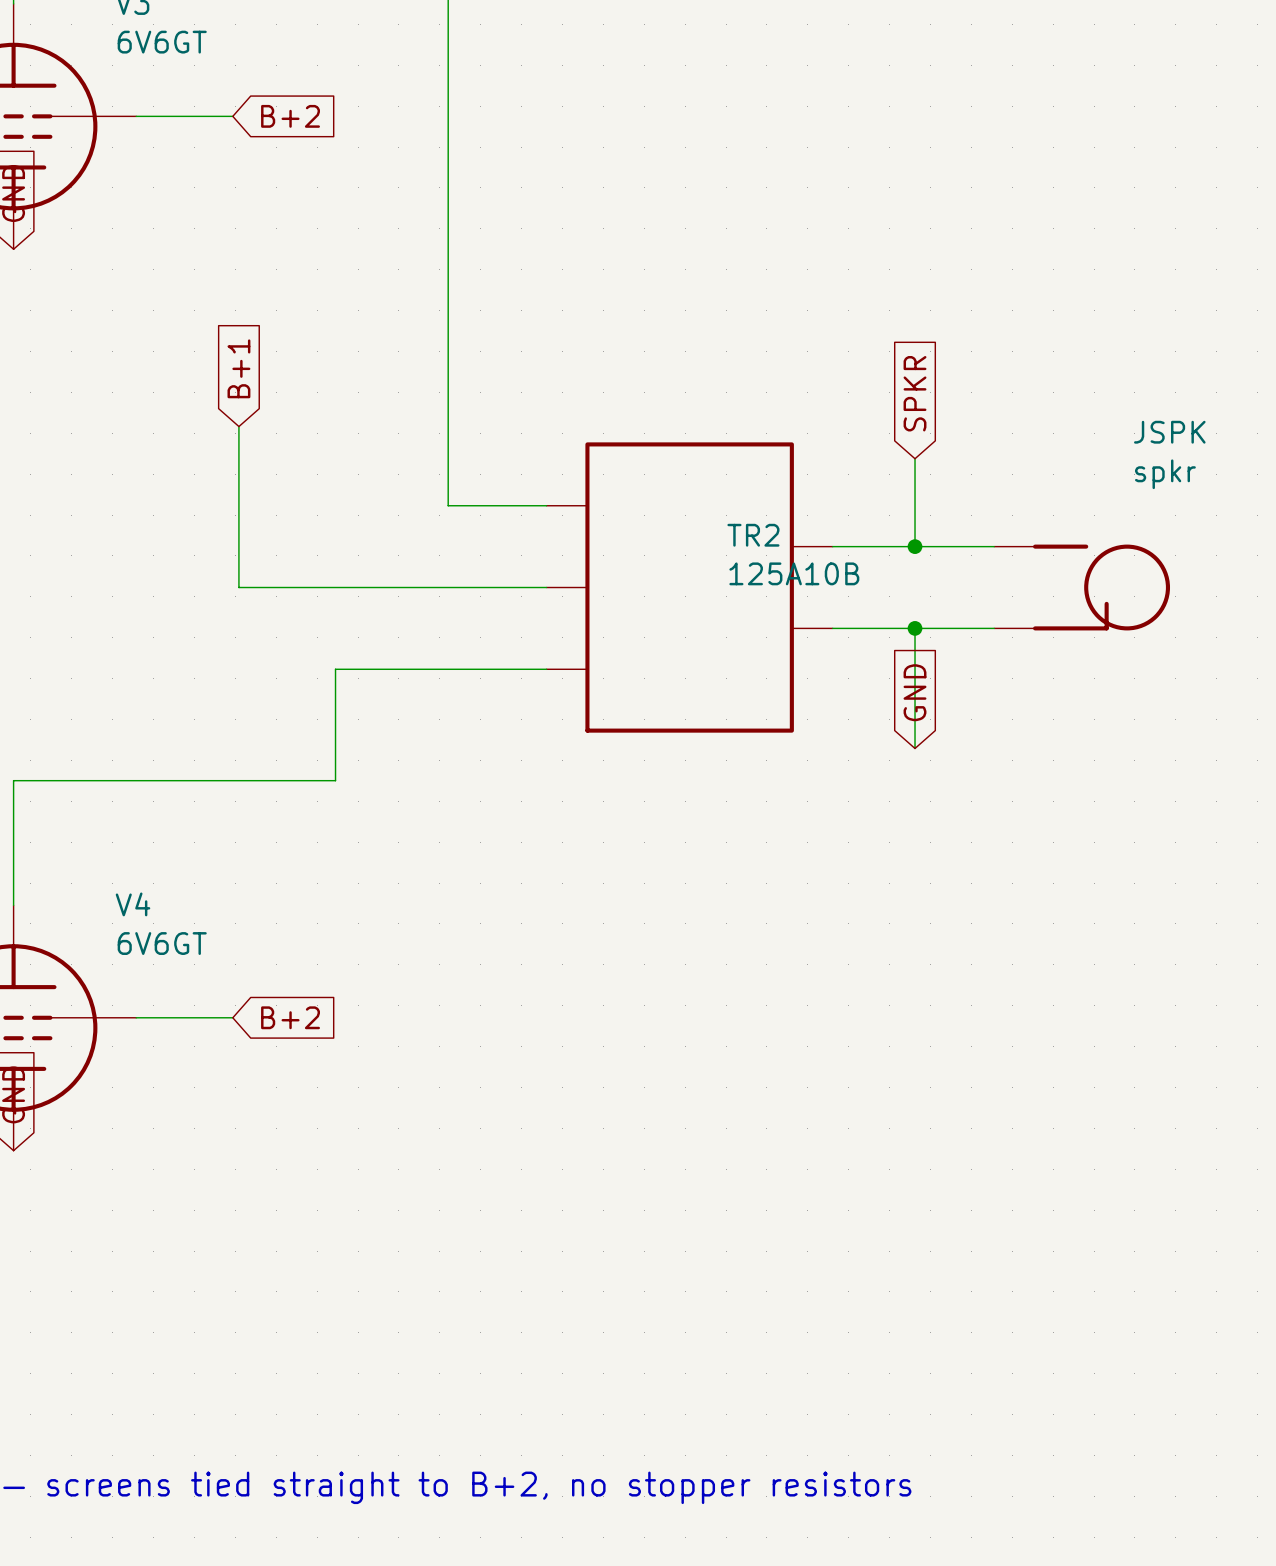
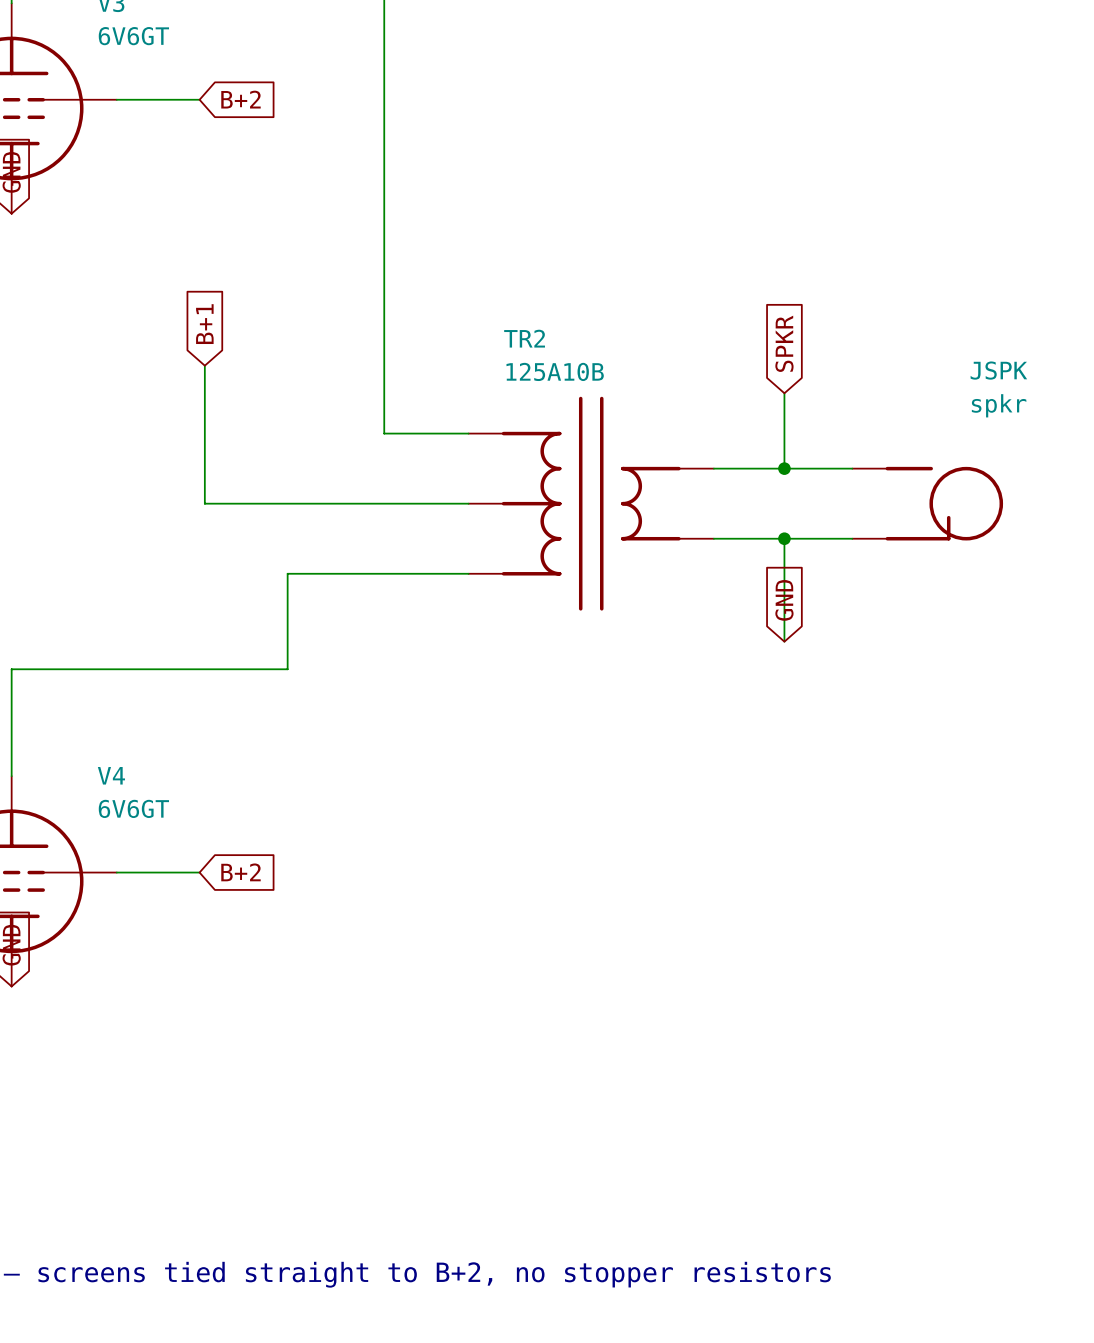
TR2 symbol: [546, 442, 833, 733] -> [468, 396, 714, 611]
TR2 name position: TR2 (753, 535) -> TR2 (524, 338)
TR2 value position: 125A10B (794, 573) -> 125A10B (555, 371)

